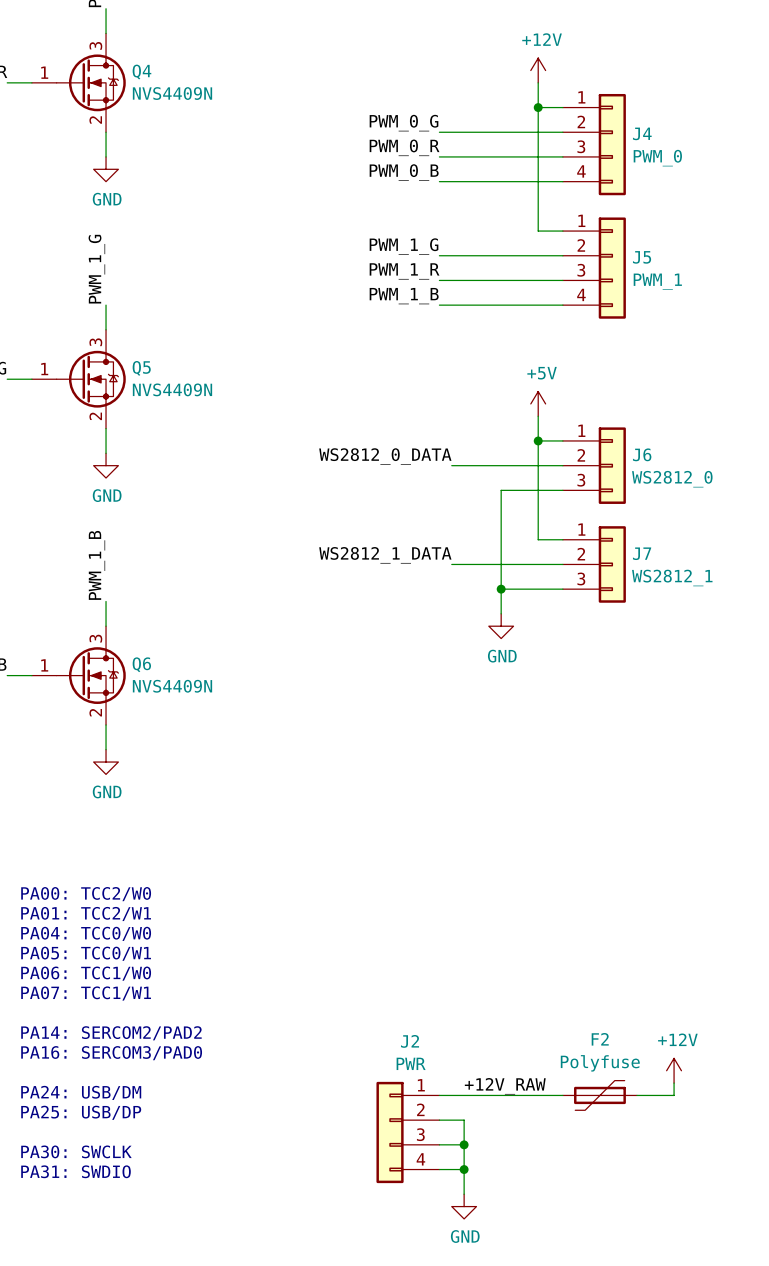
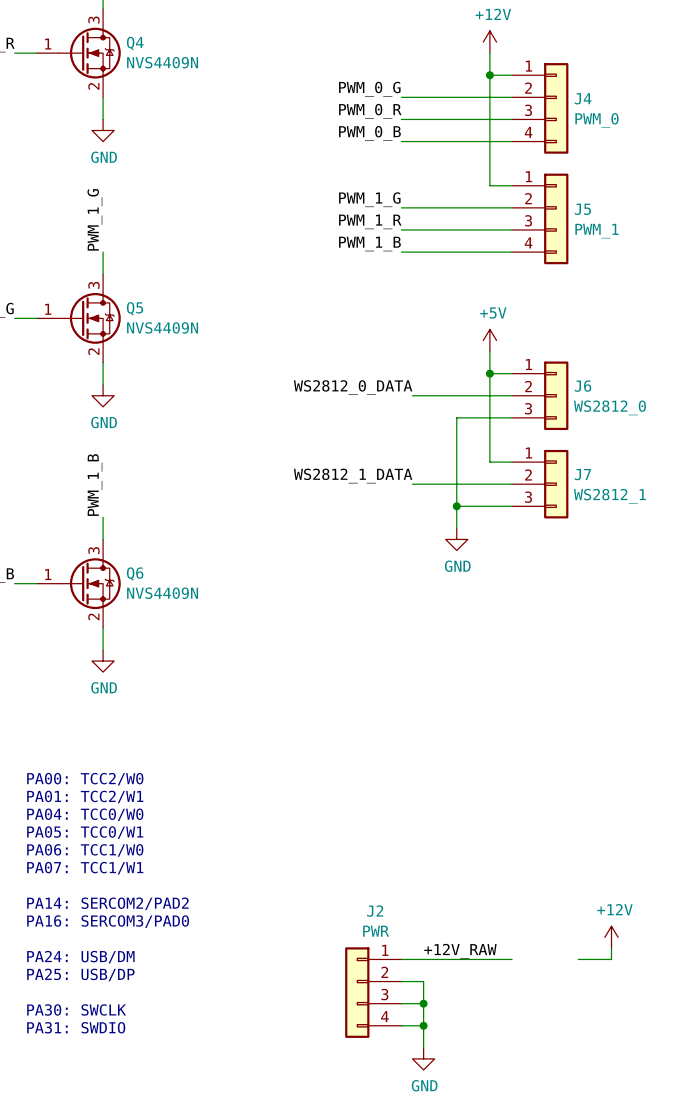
F2: Polyfuse (599, 1095) -> none

